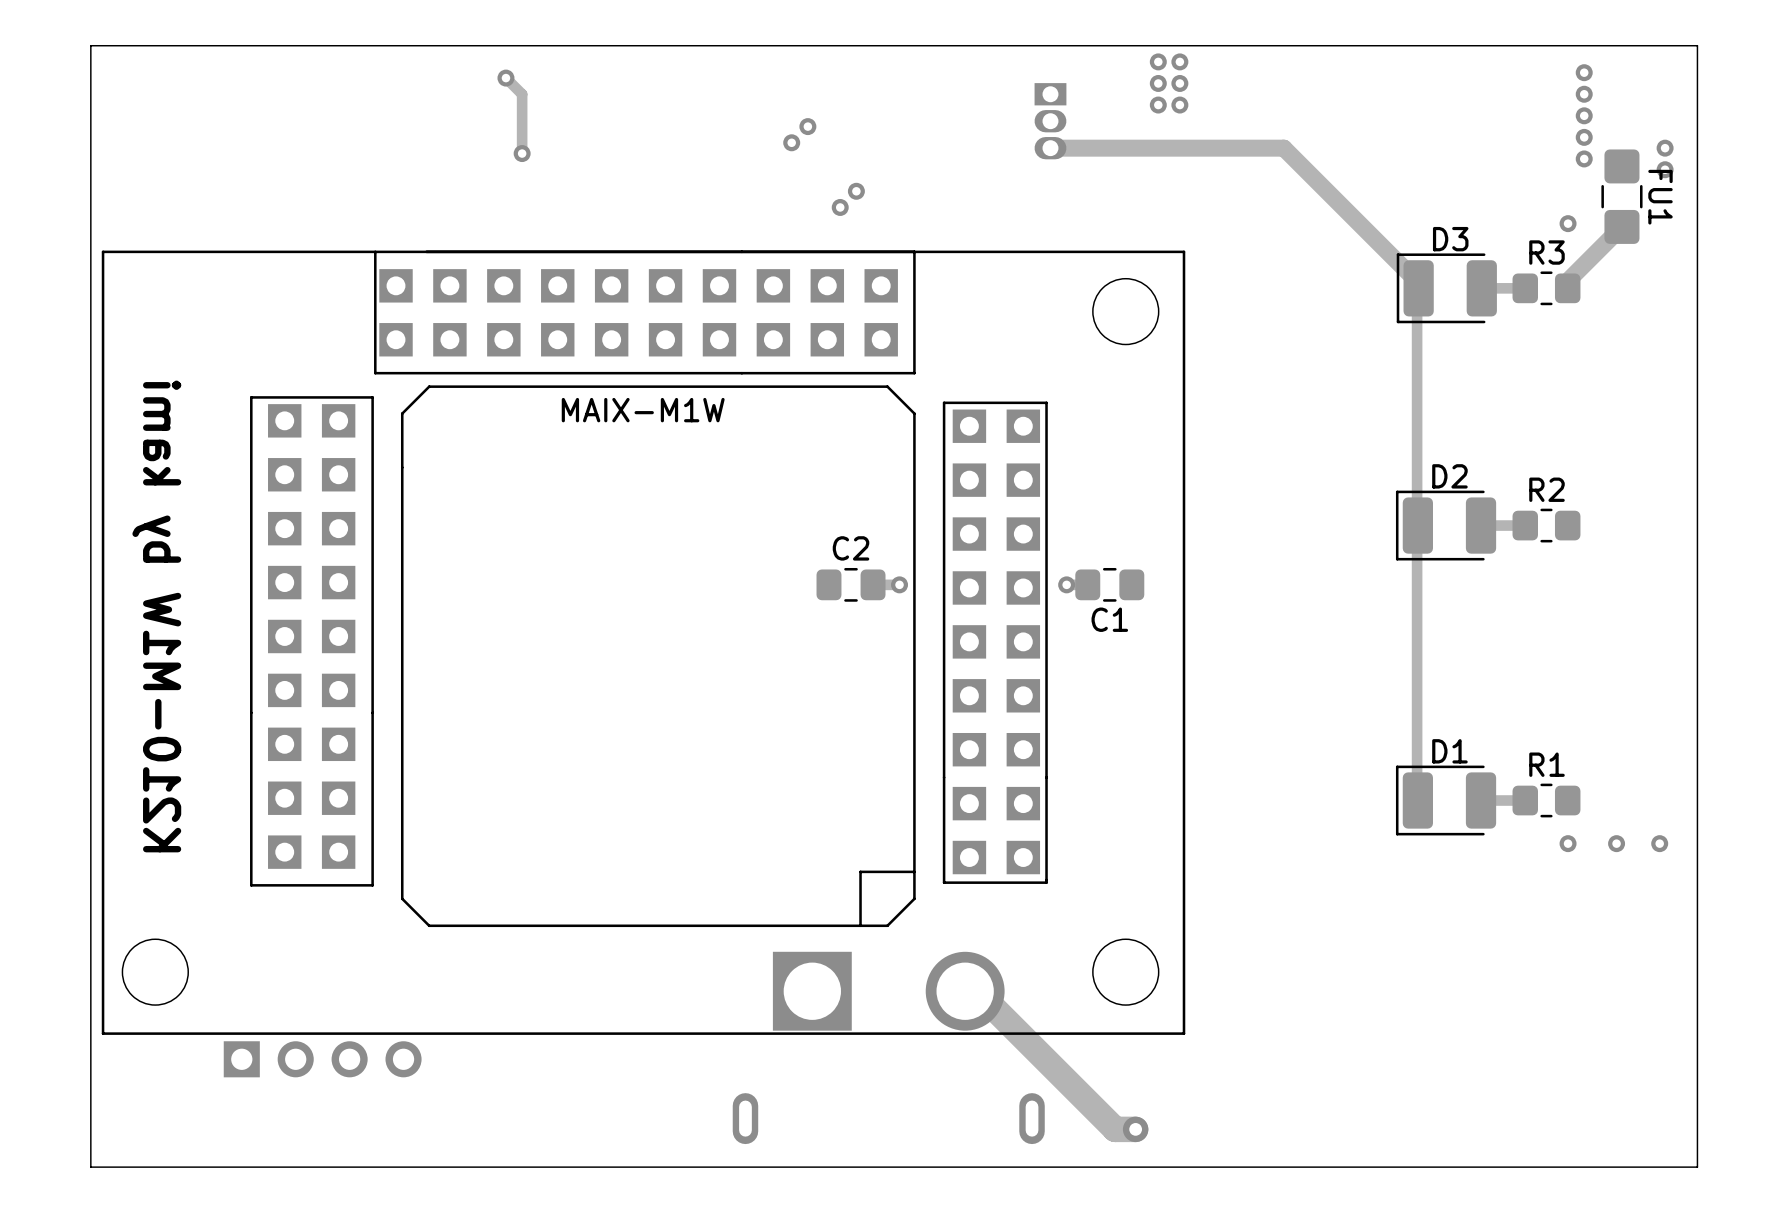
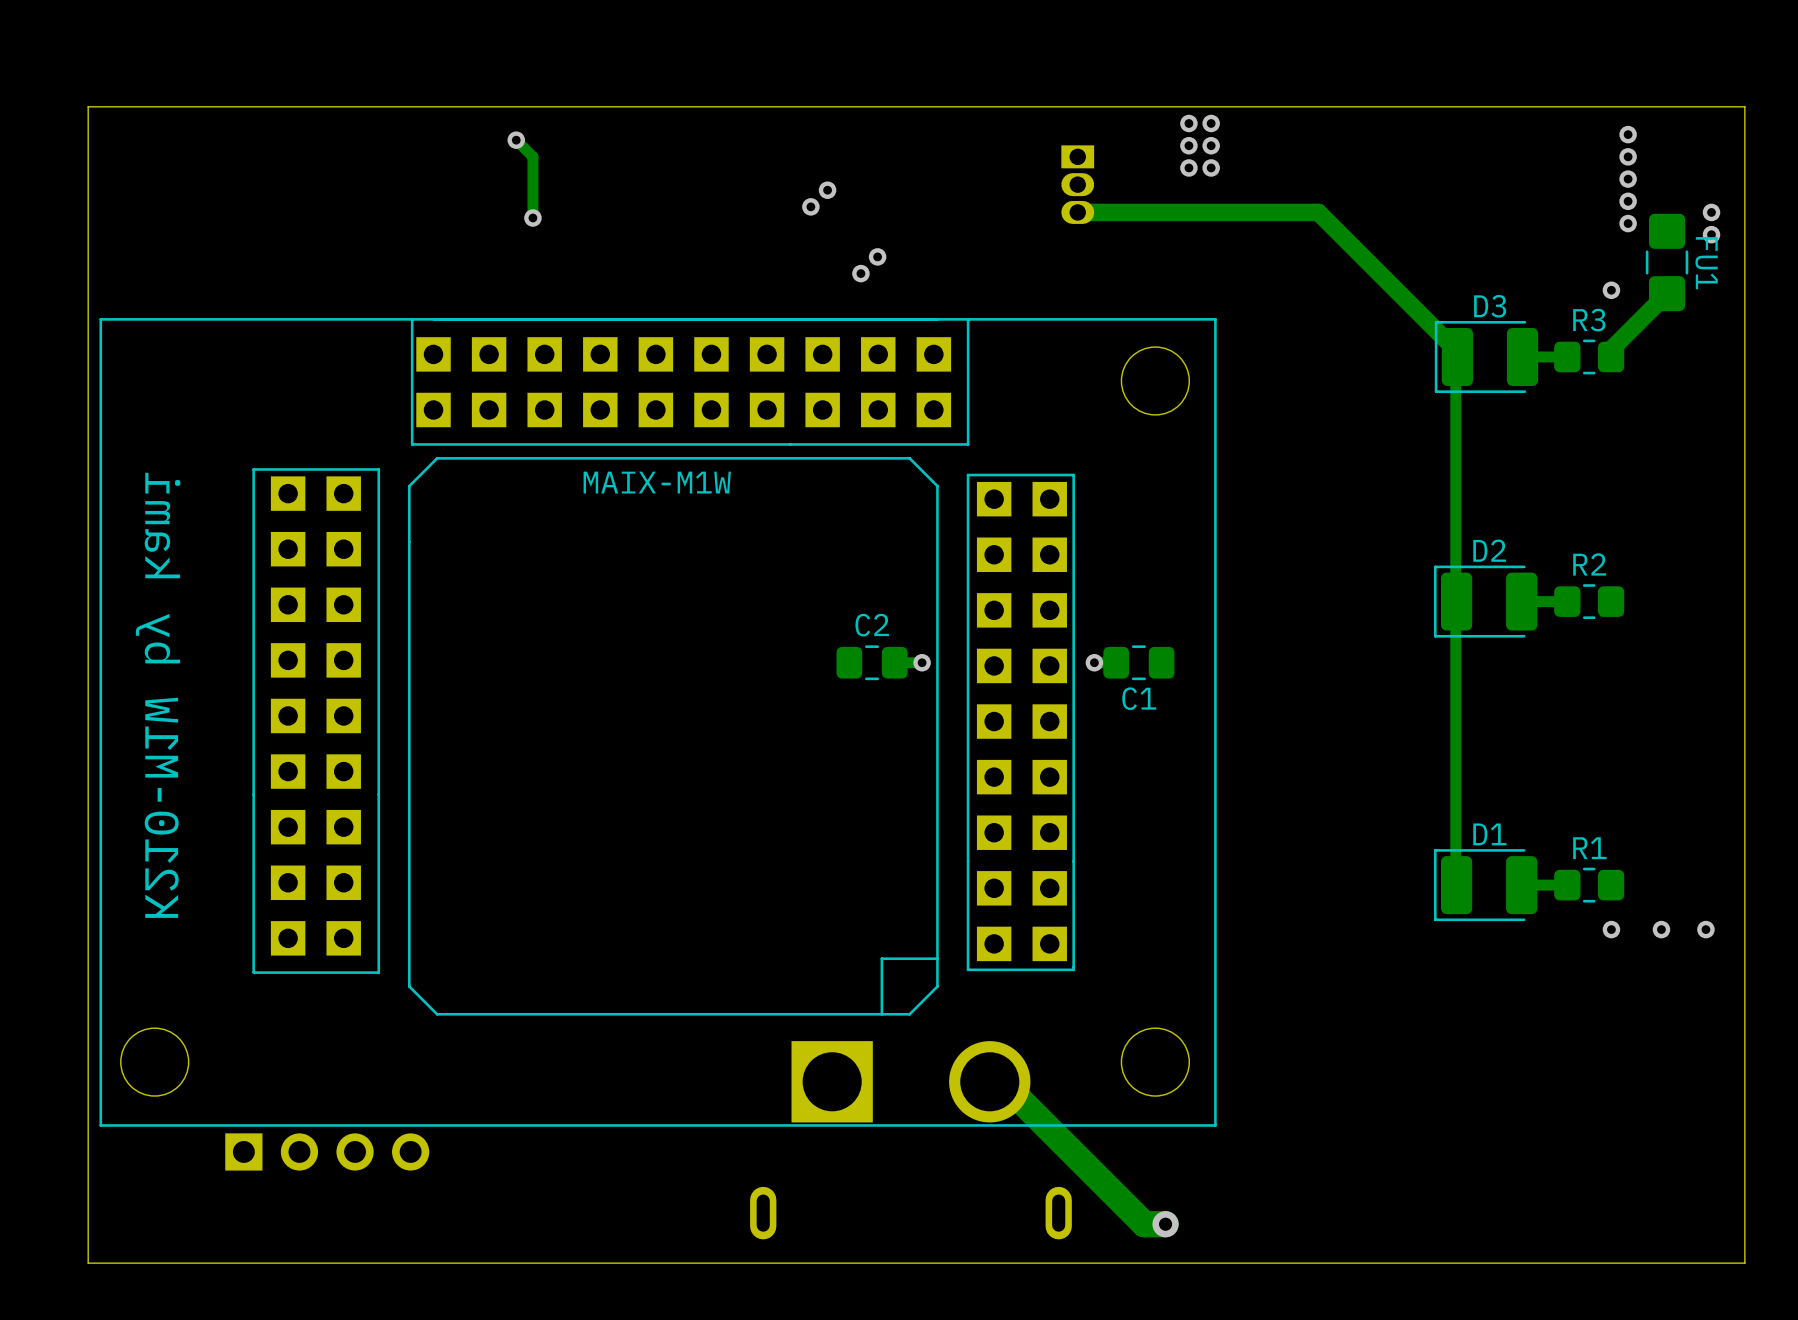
part footprint: [101, 250, 1186, 1035] -> [99, 318, 1217, 1127]

